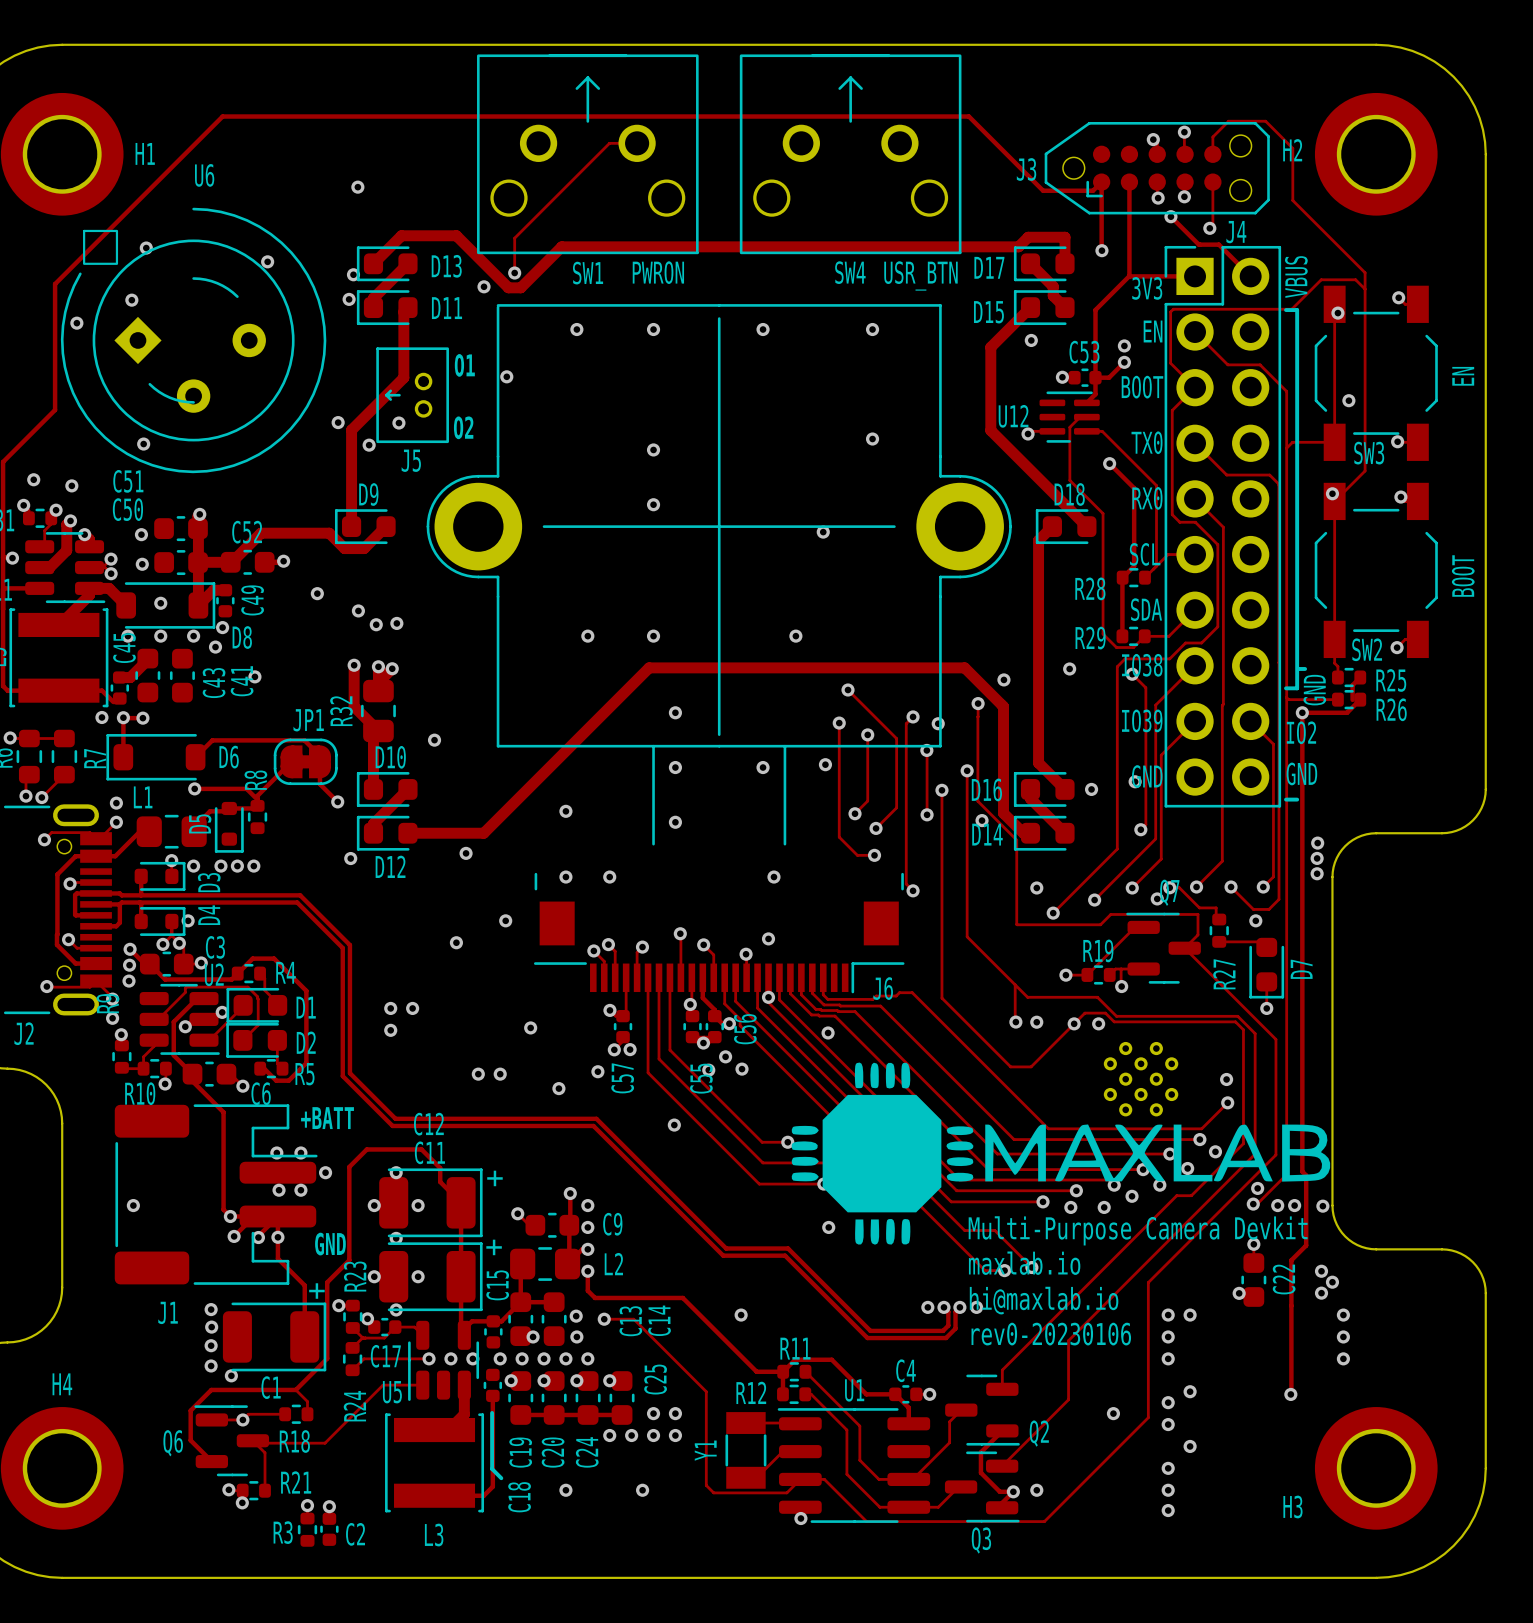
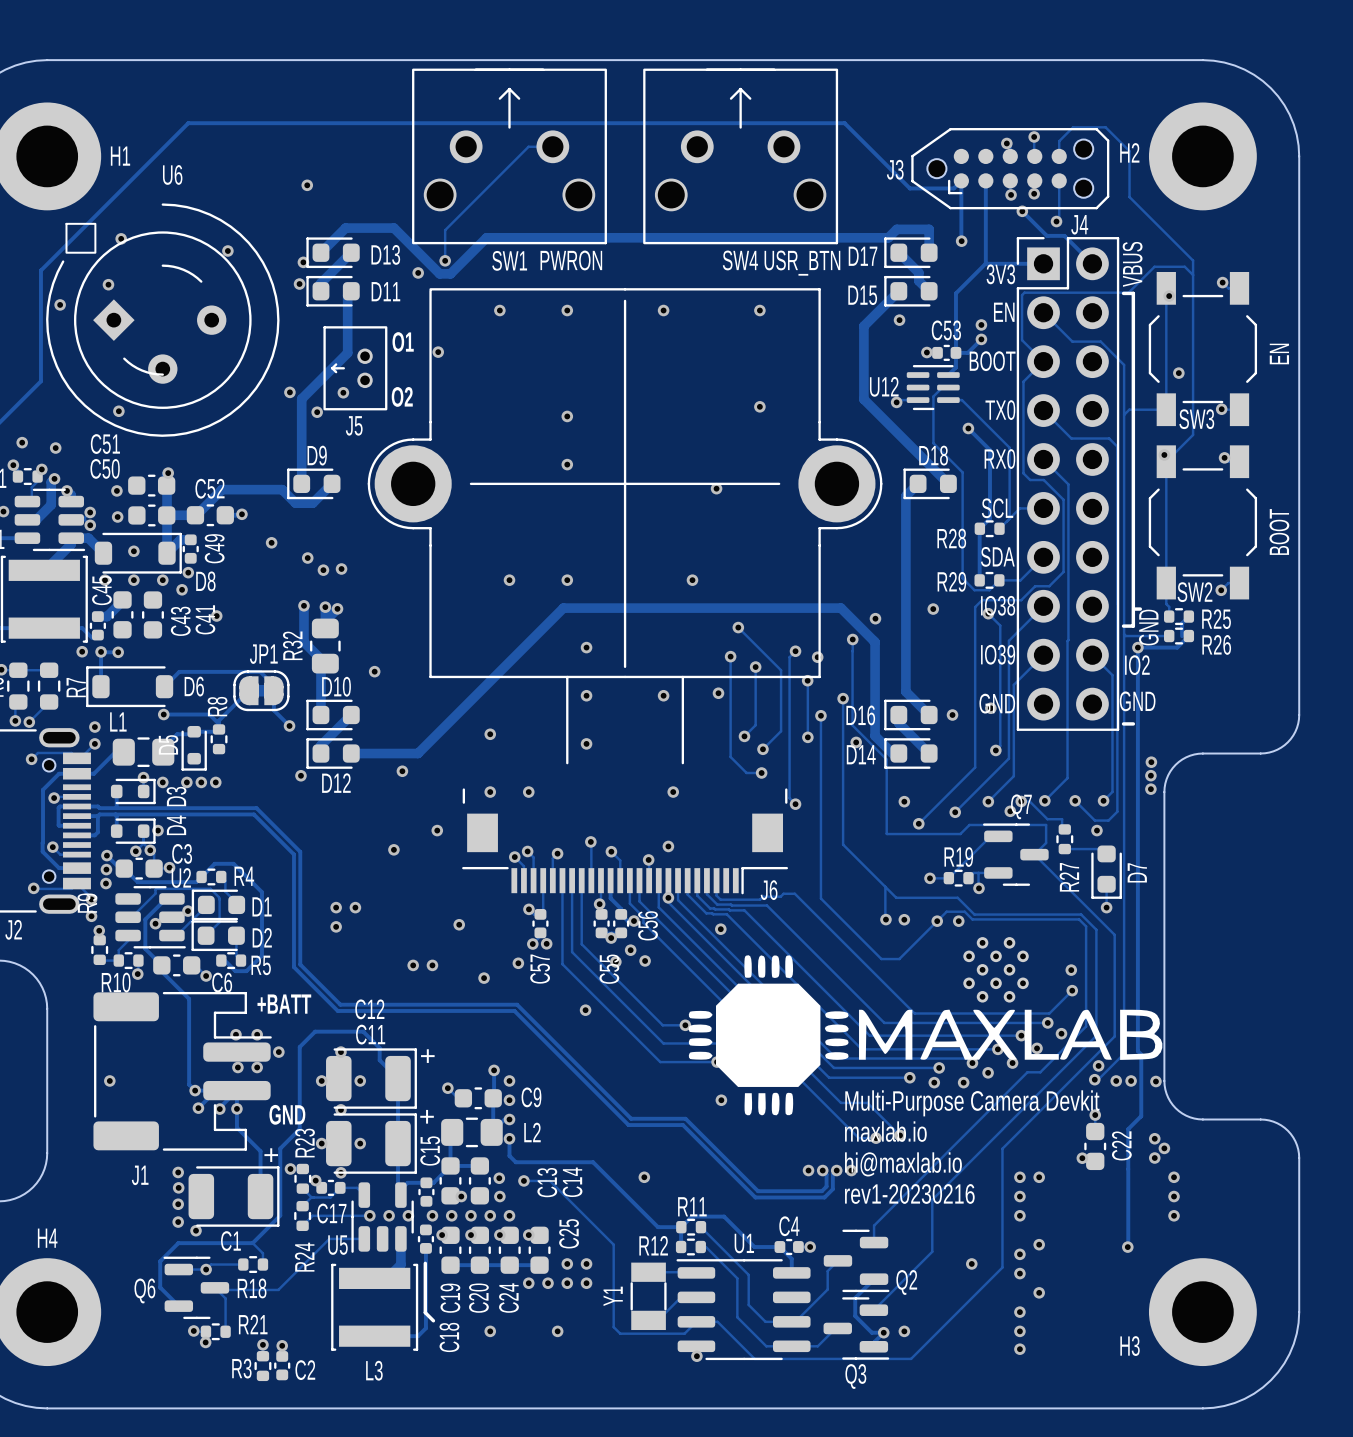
text: rev0-20230106 (1051, 1334) -> rev1-20230216 (909, 1193)

